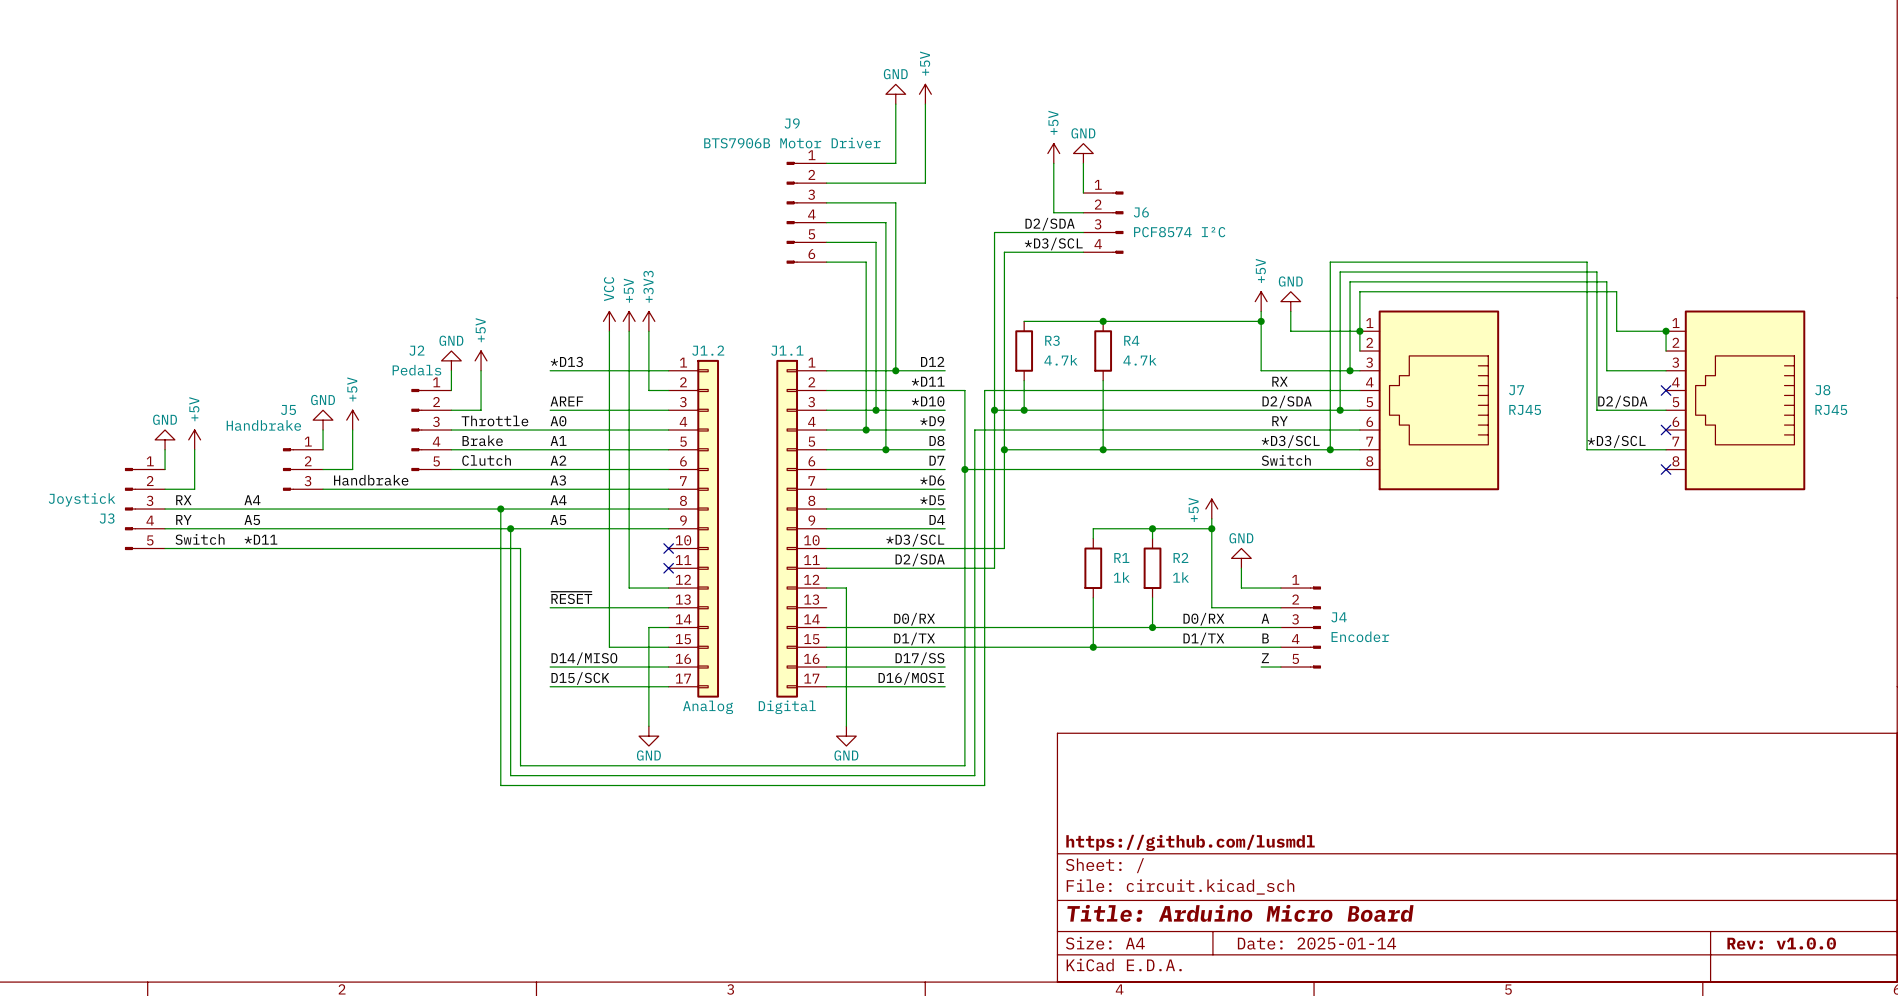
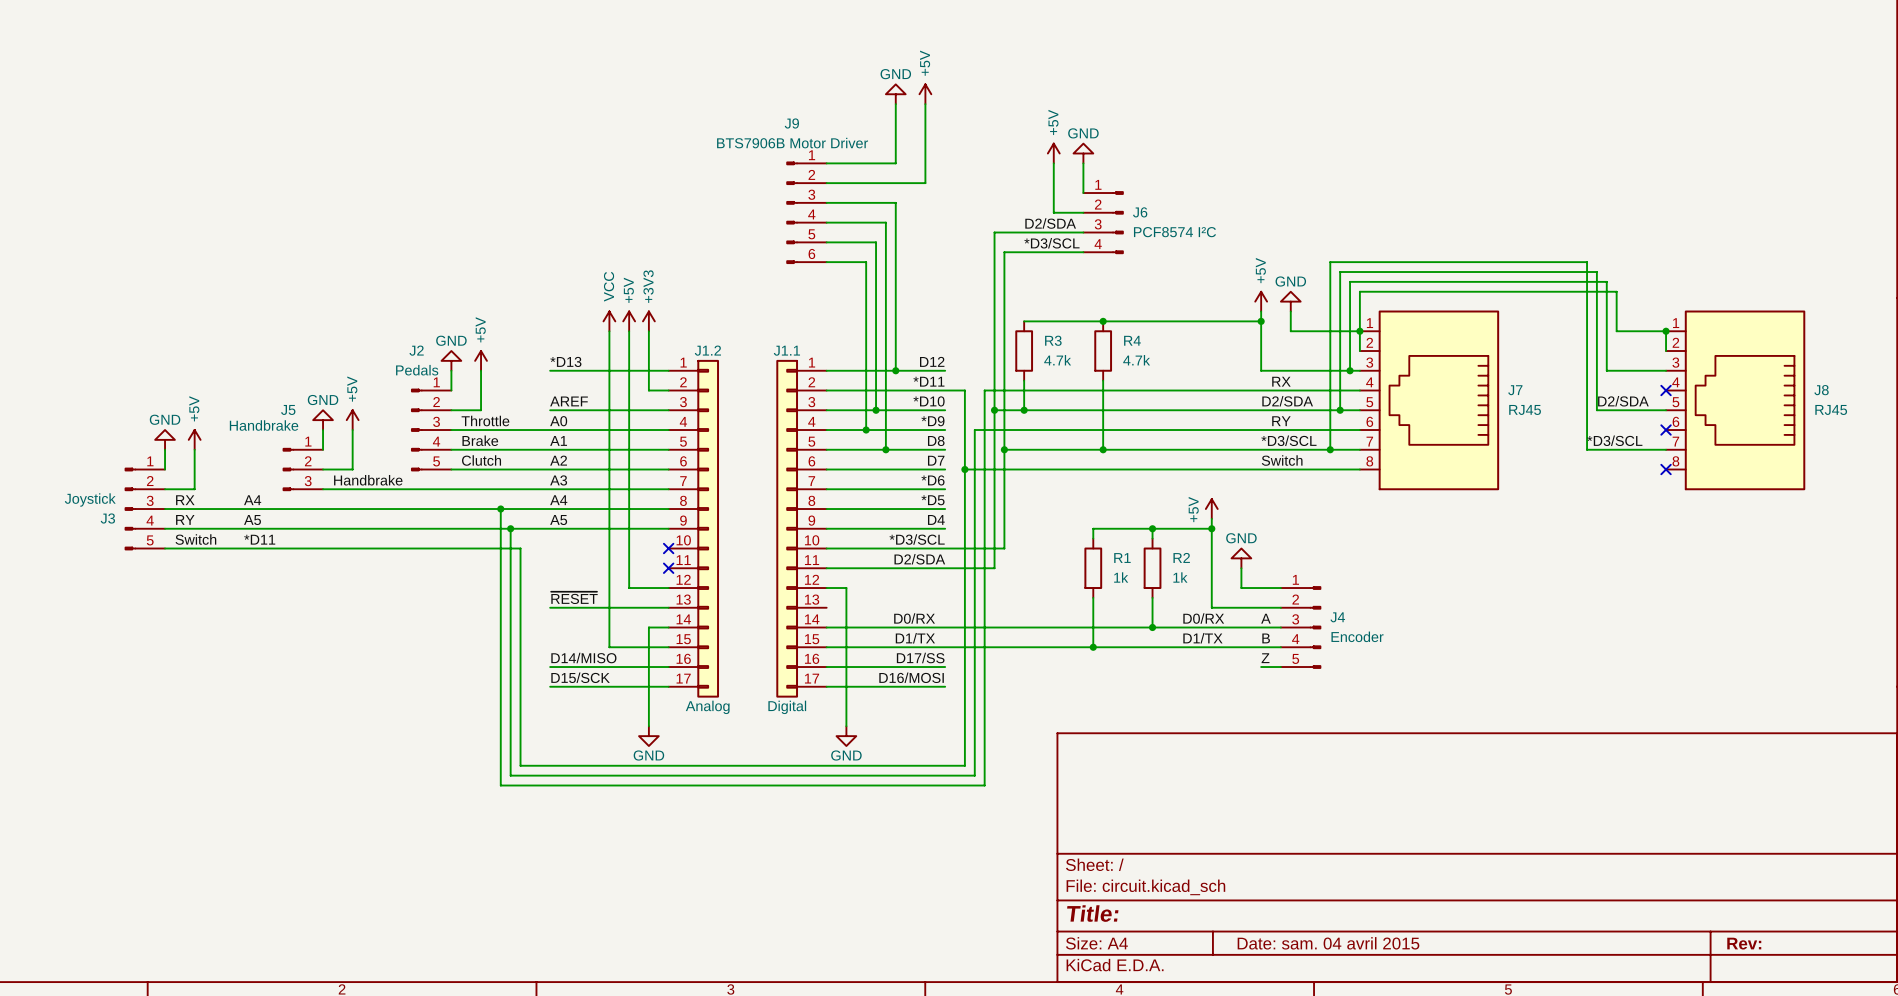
title block: https://github.com/lusmdl (1190, 842) -> none
title block: Title: Arduino Micro Board (1240, 913) -> Title: (1092, 913)
title block: Date: 2025-01-14 (1316, 943) -> Date: sam. 04 avril 2015 (1328, 943)
title block: Rev: v1.0.0 (1781, 943) -> Rev: (1744, 943)

